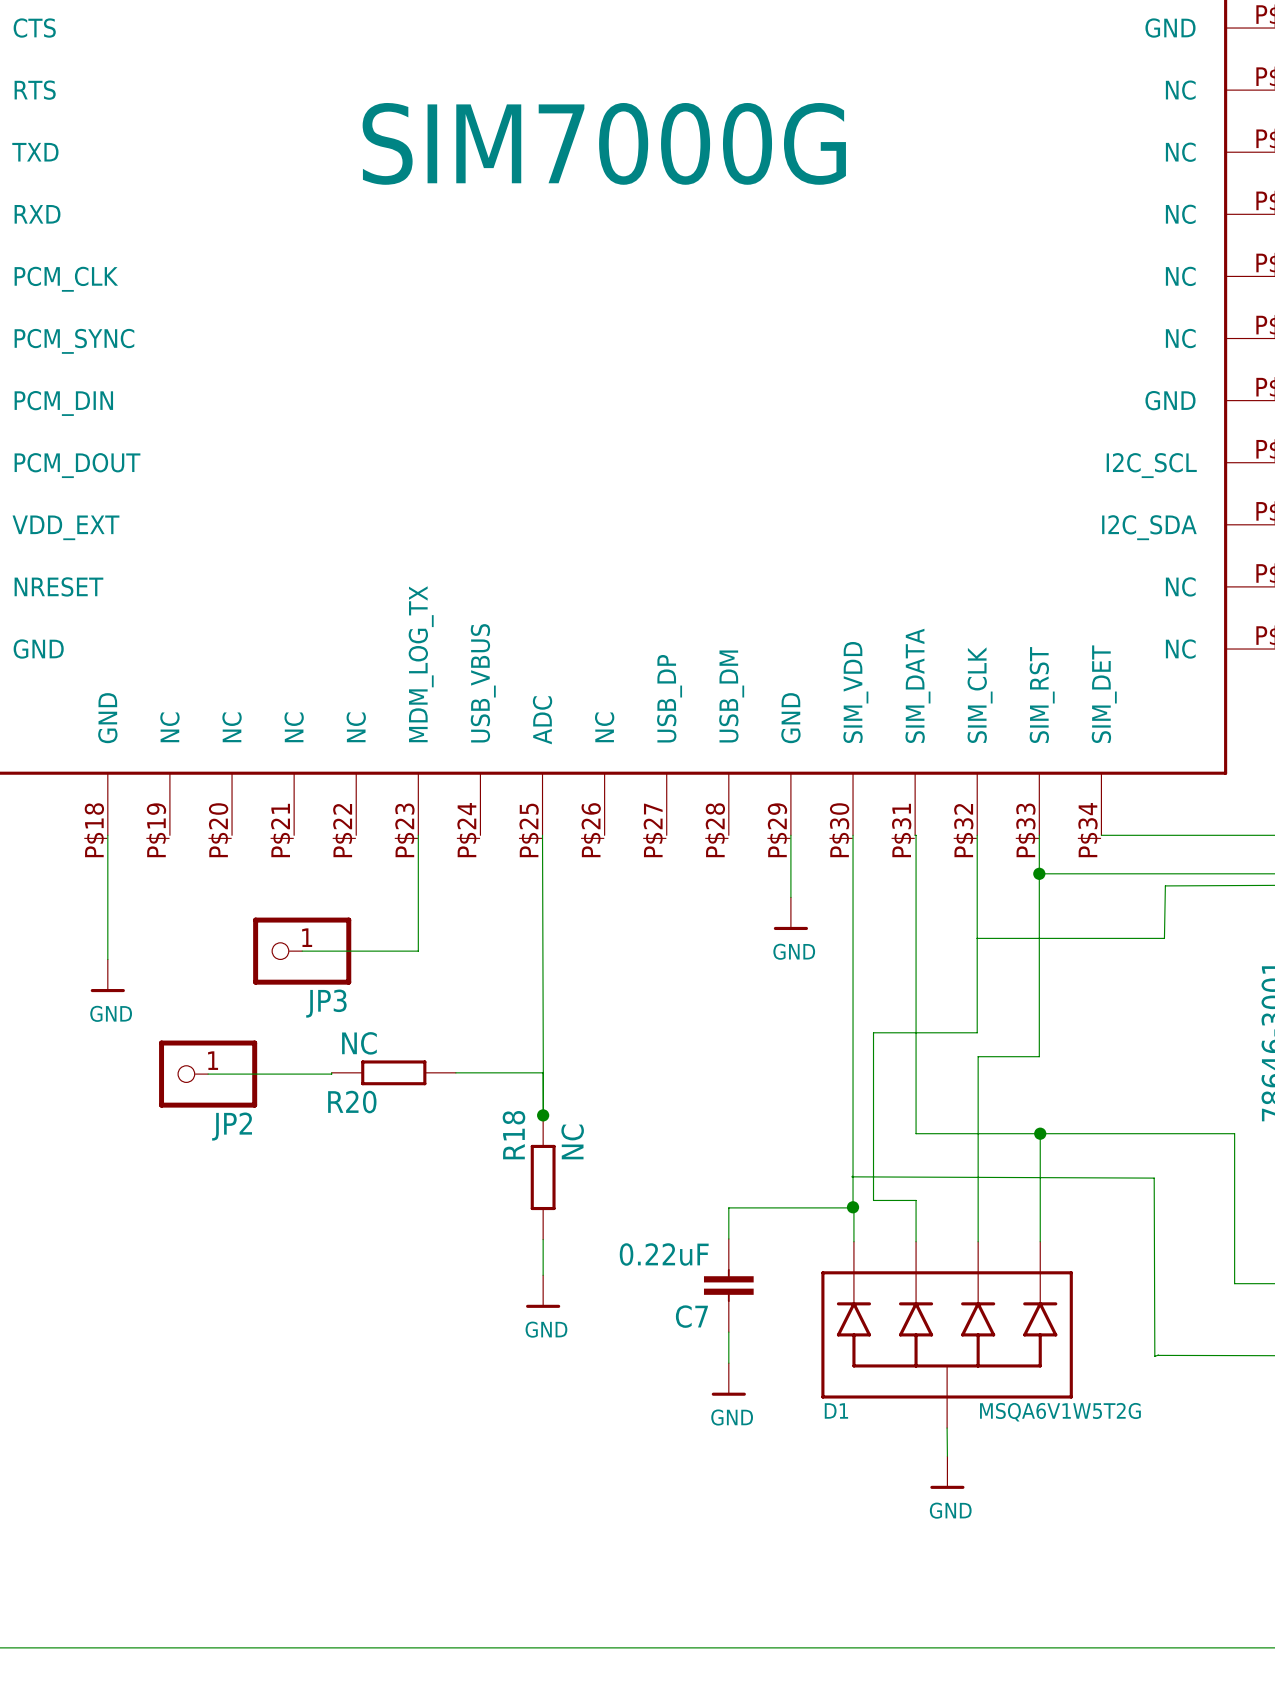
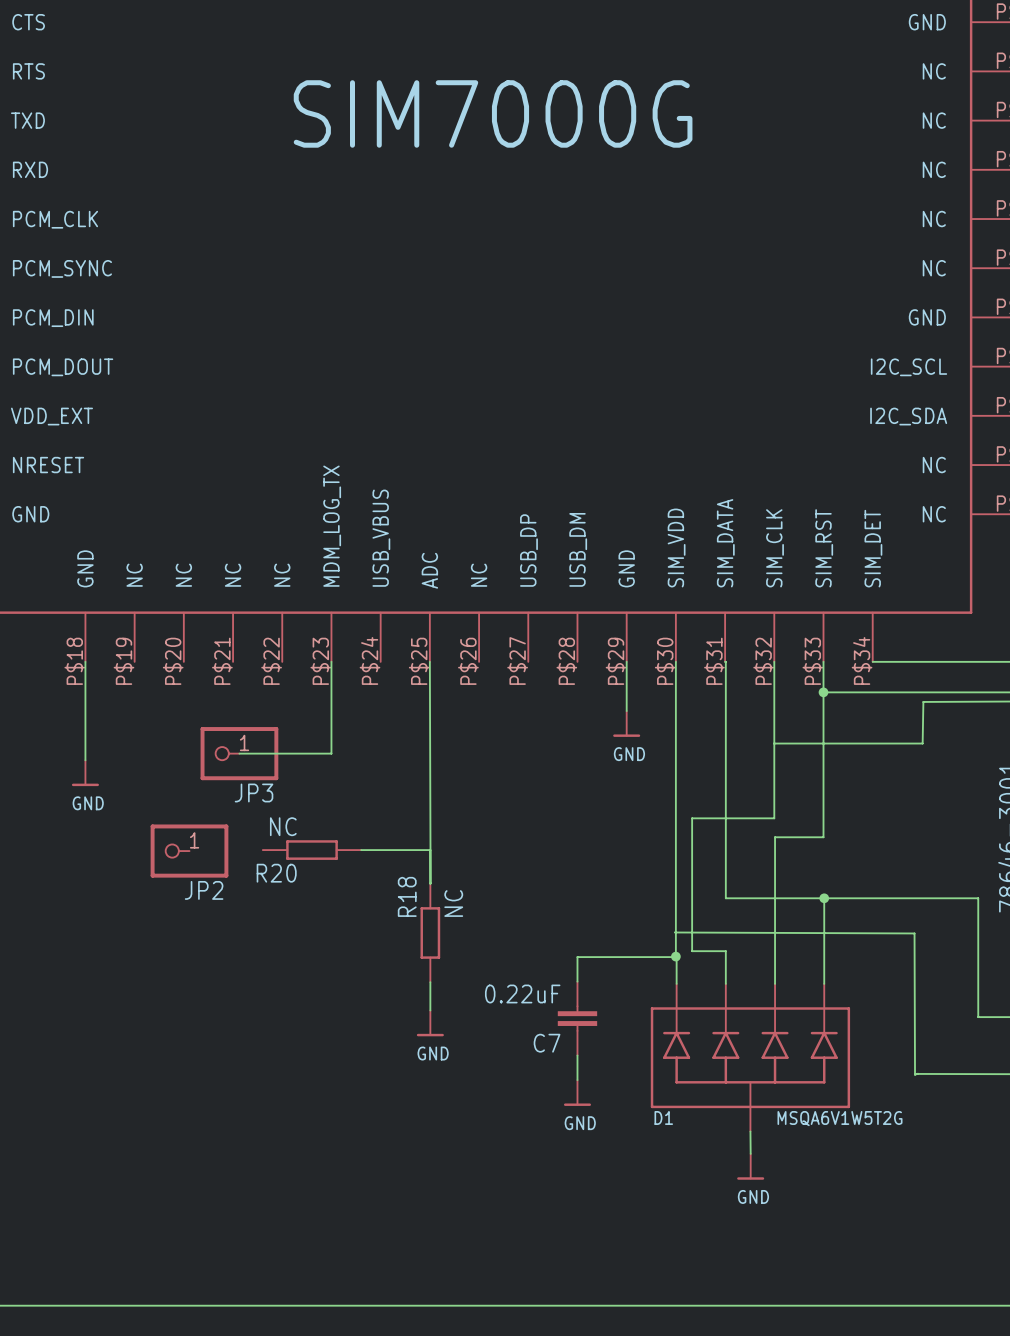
wire: (331, 1072) (208, 1074) -> none
JP2 position: (208, 1074) -> (189, 851)
junction: (543, 1115) -> none

